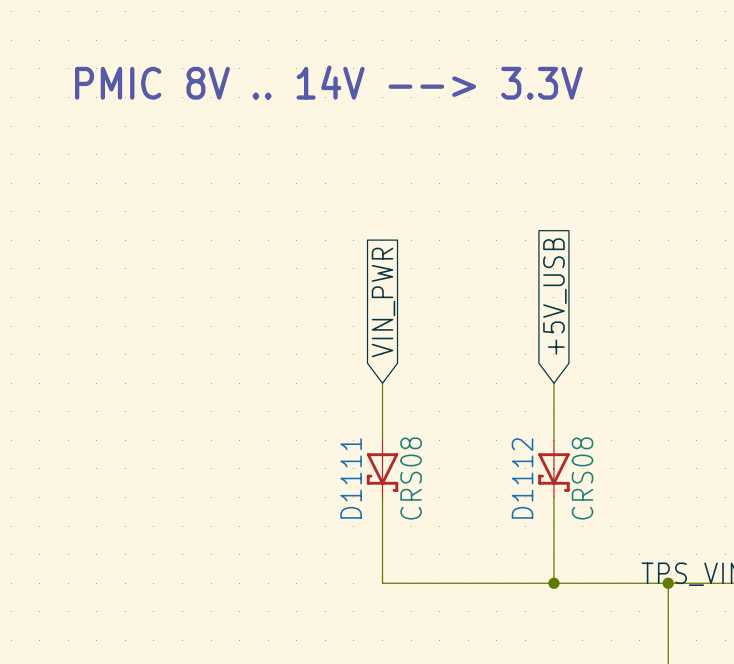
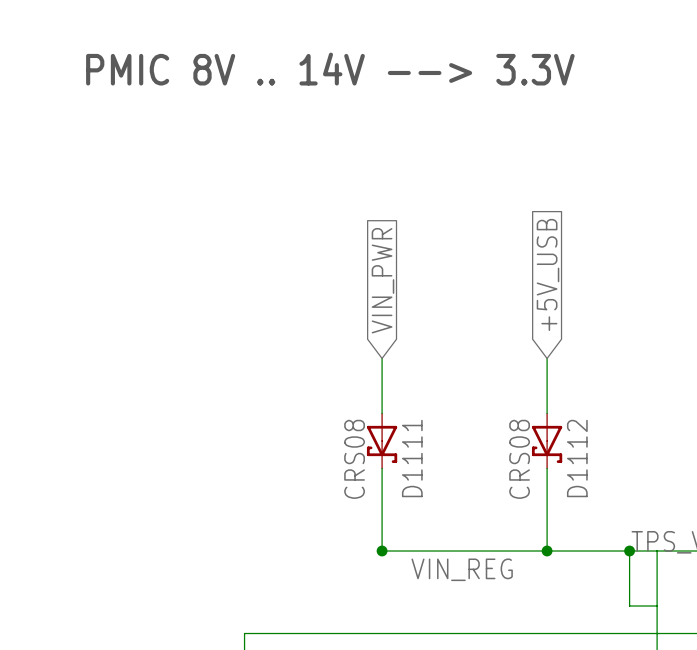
D1111 name position: D1111 (351, 478) -> D1111 (412, 458)
D1111 value position: CRS08 (411, 478) -> CRS08 (354, 459)
D1112 name position: D1112 (522, 478) -> D1112 (577, 458)
D1112 value position: CRS08 (582, 478) -> CRS08 (519, 459)
junction: none -> (382, 551)
wire: none -> (629, 551) (629, 606) (657, 606)
junction position: (668, 583) -> (629, 551)
label: none -> VIN_REG (462, 569)

